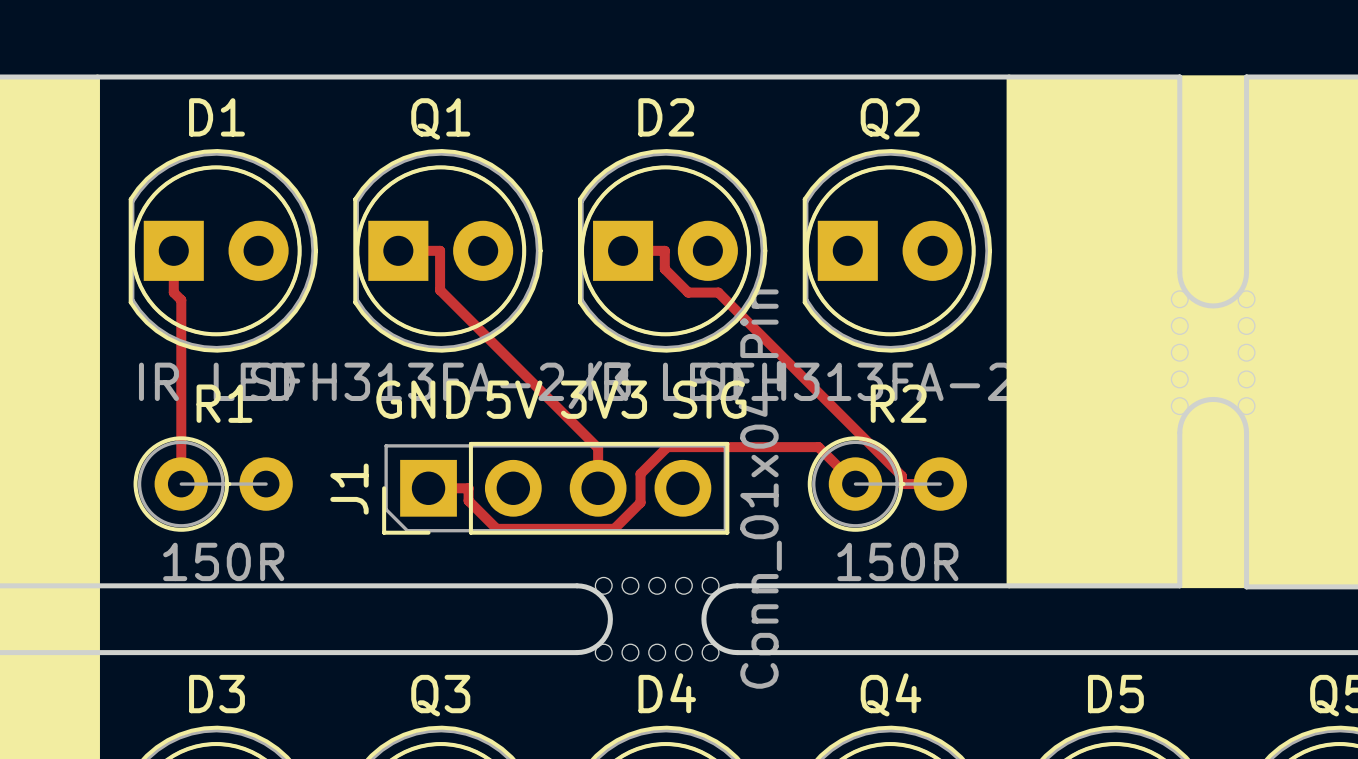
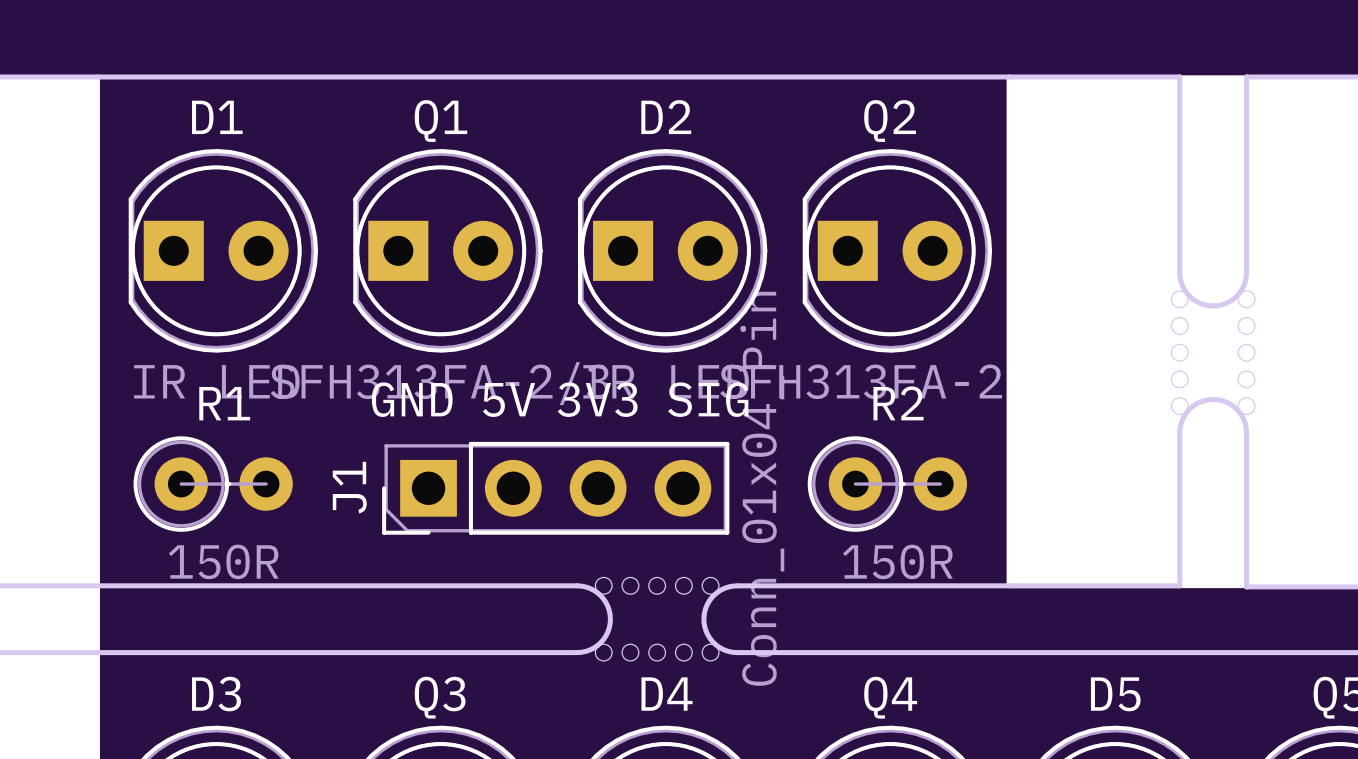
track: (173, 250) (173, 292) (181, 300) (181, 484) -> none
track: (398, 250) (440, 250) (440, 290) (598, 448) (598, 488) -> none
track: (623, 250) (664, 250) (664, 269) (688, 292) (718, 292) (901, 476) (901, 484) (940, 484) -> none
track: (855, 484) (818, 447) (667, 447) (640, 473) (640, 502) (614, 528) (496, 528) (468, 500) (468, 488) (428, 488) -> none

